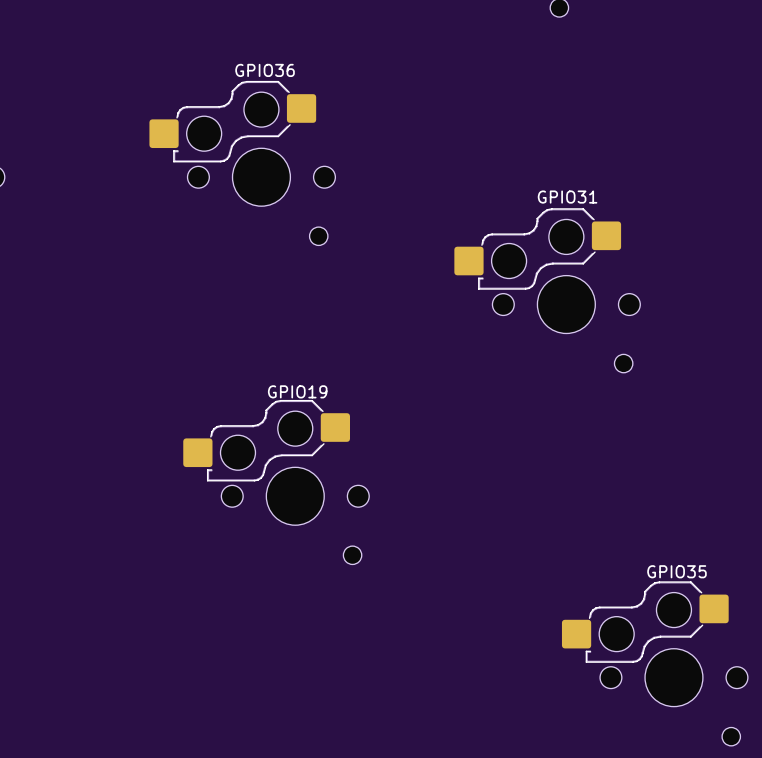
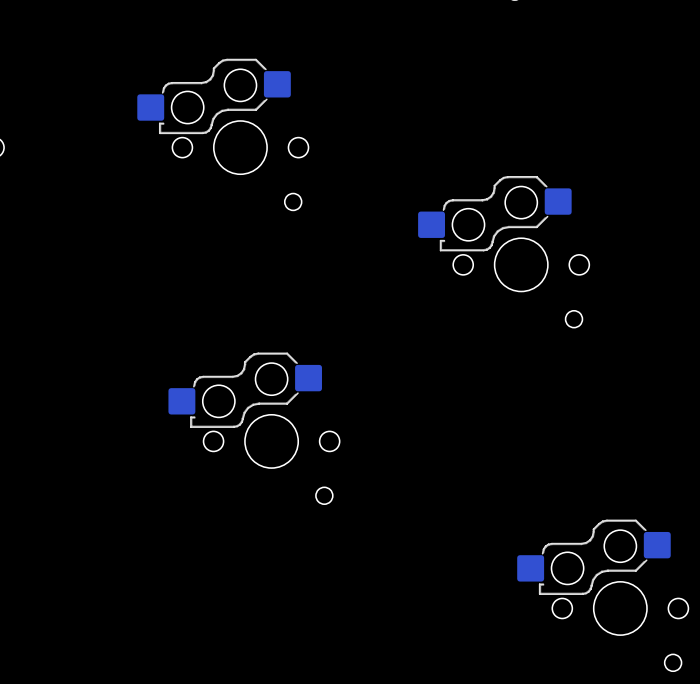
text: GPIO36 (265, 70) -> none
text: GPIO31 (567, 197) -> none
text: GPIO19 (297, 391) -> none
text: GPIO35 (676, 571) -> none

